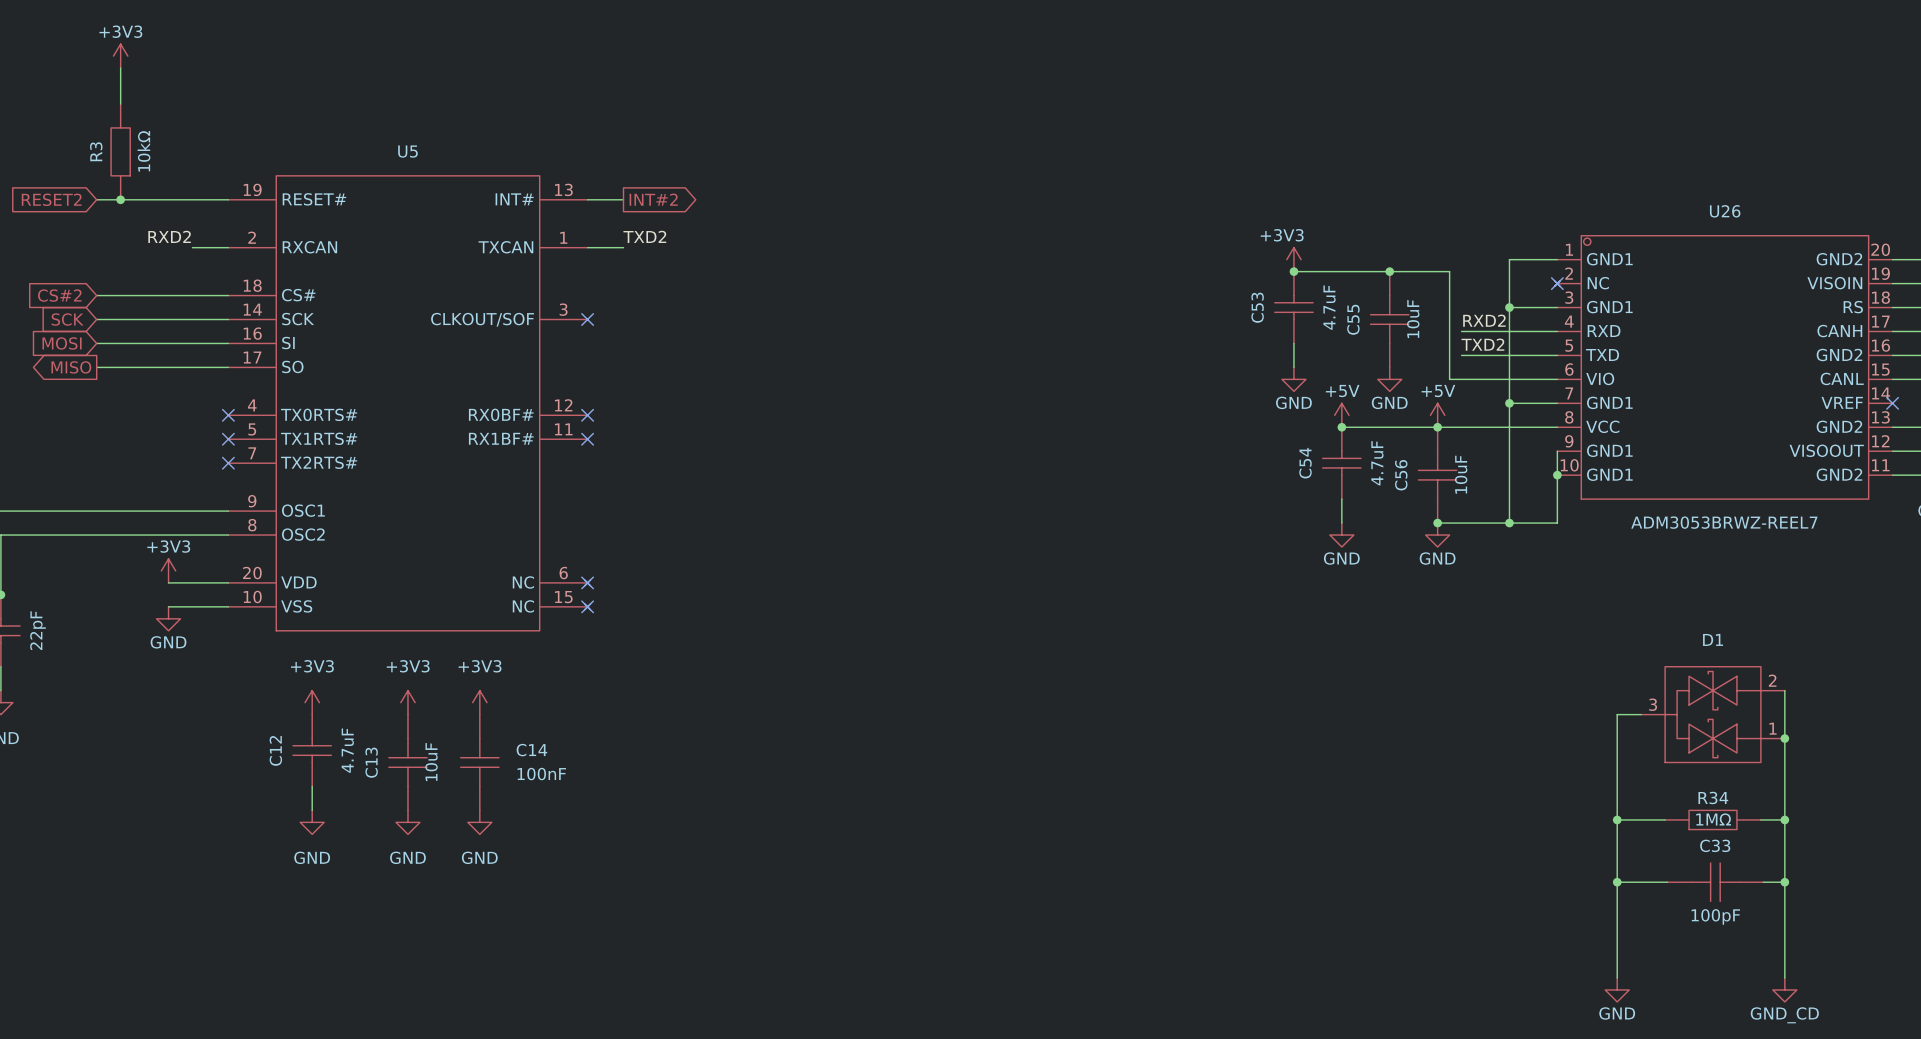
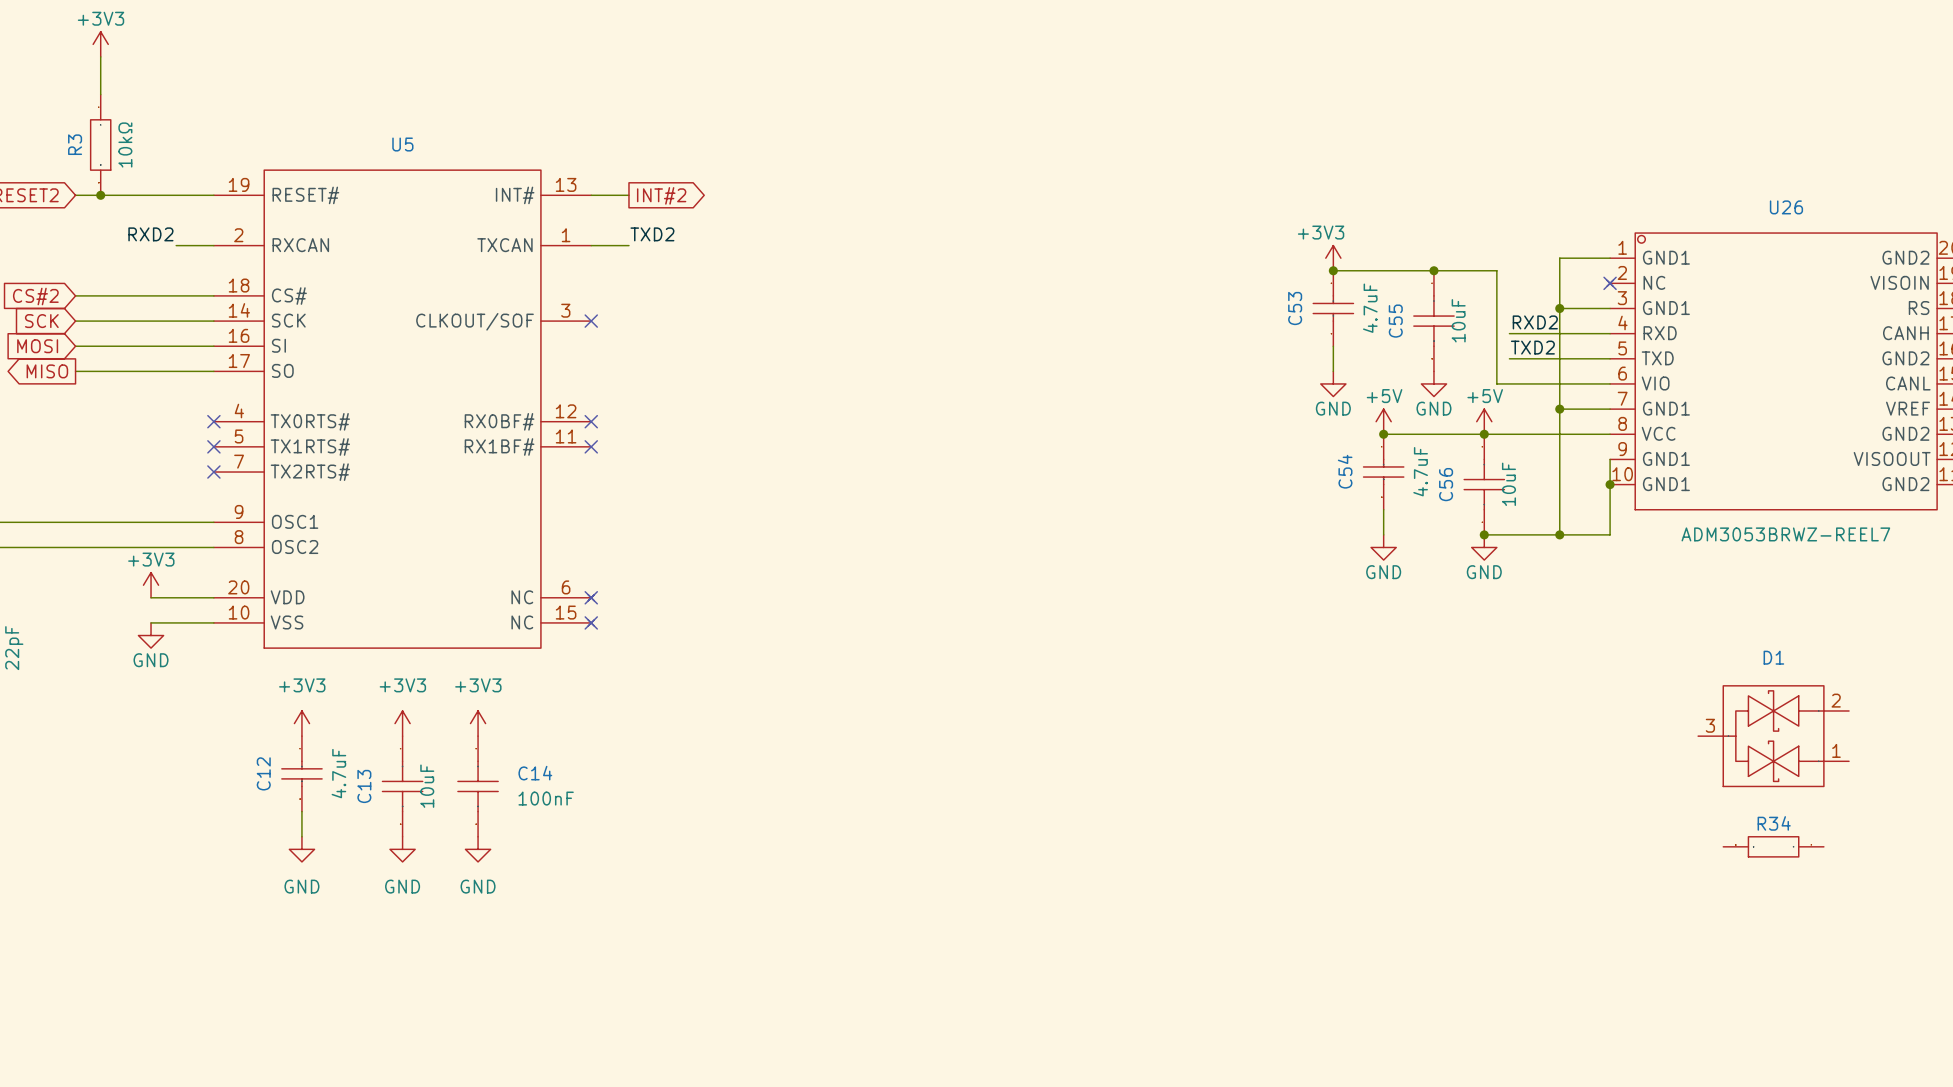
wire: (1784, 690) (1784, 978) -> none
wire: (1641, 714) (1617, 714) (1617, 978) -> none
junction: (1784, 738) -> none
wire: (1617, 819) (1665, 819) -> none
junction: (1617, 819) -> none
R34 value: 1MΩ (1713, 819) -> none
wire: (1760, 819) (1784, 819) -> none
junction: (1784, 819) -> none
wire: (1617, 882) (1667, 882) -> none
junction: (1617, 882) -> none
C33: 100pF (1715, 882) -> none
wire: (1763, 882) (1784, 882) -> none
junction: (1784, 882) -> none
power symbol: GND (1617, 989) -> none
power symbol: GND_CD (1784, 989) -> none

